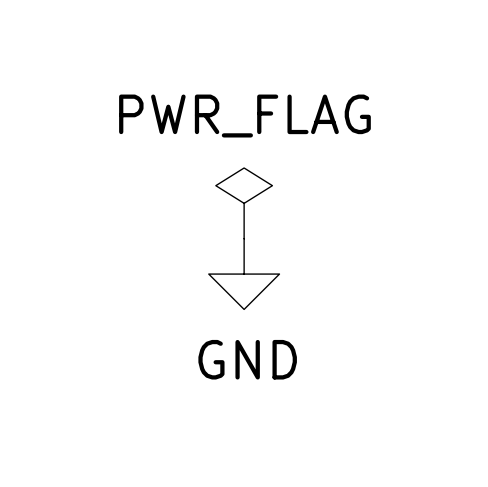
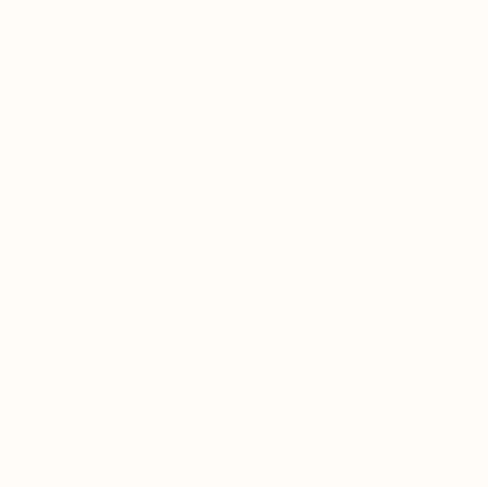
power symbol: PWR_FLAG (244, 203) -> none
power symbol: GND (244, 274) -> none

